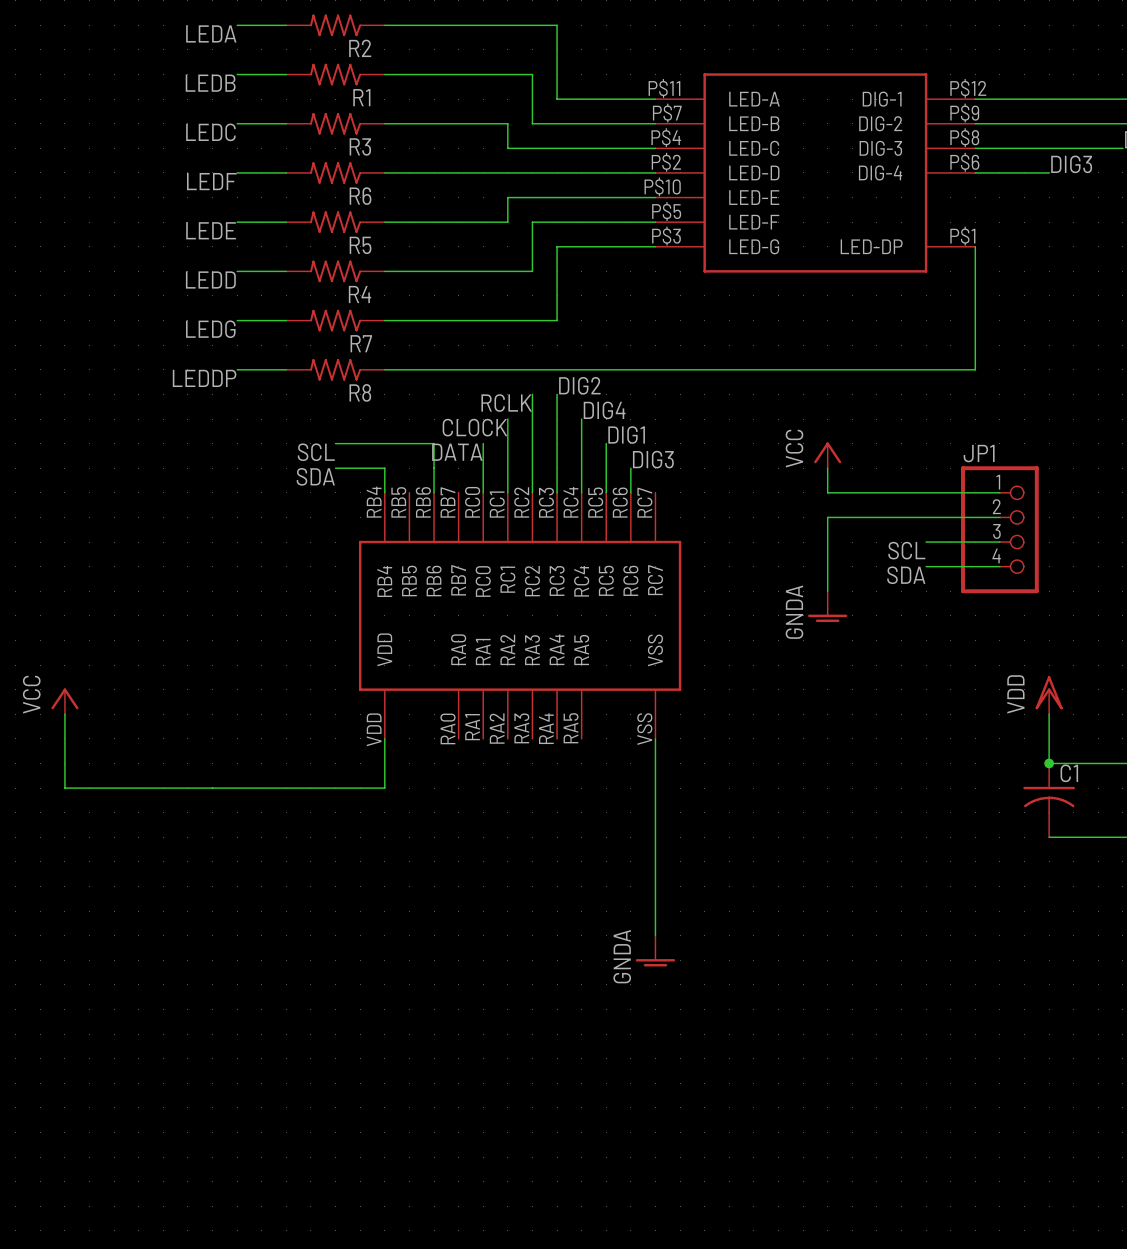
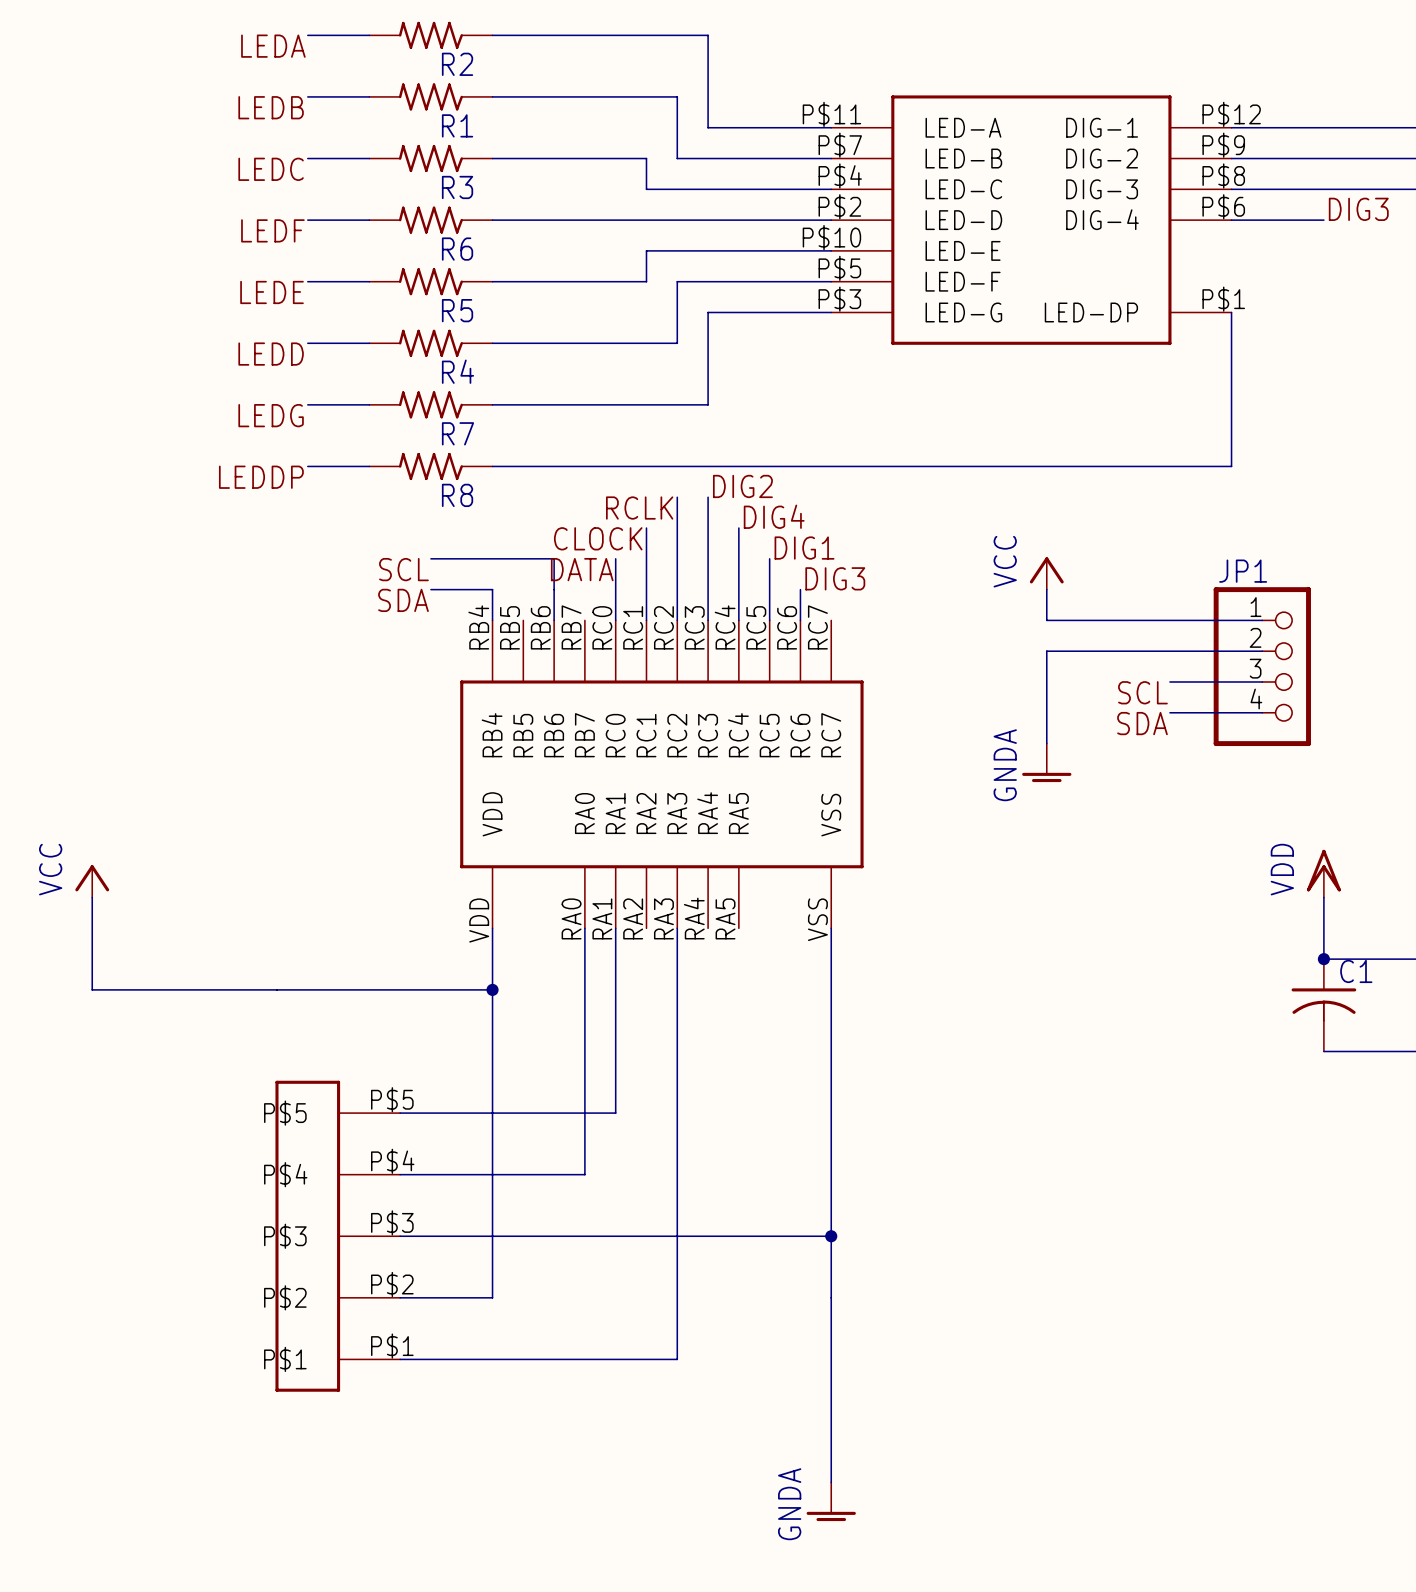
wire: none -> (584, 928) (584, 1174) (400, 1174)
wire: none -> (615, 928) (615, 1113) (400, 1113)
wire: none -> (677, 928) (677, 1359) (400, 1359)
wire: none -> (492, 989) (492, 1297) (400, 1297)
junction: none -> (492, 989)
wire: none -> (831, 1174) (831, 1482)
power symbol: GNDA (655, 951) -> none
part: none -> (337, 1236)
wire: none -> (400, 1236) (831, 1236)
junction: none -> (831, 1236)
power symbol: none -> GNDA (831, 1501)

